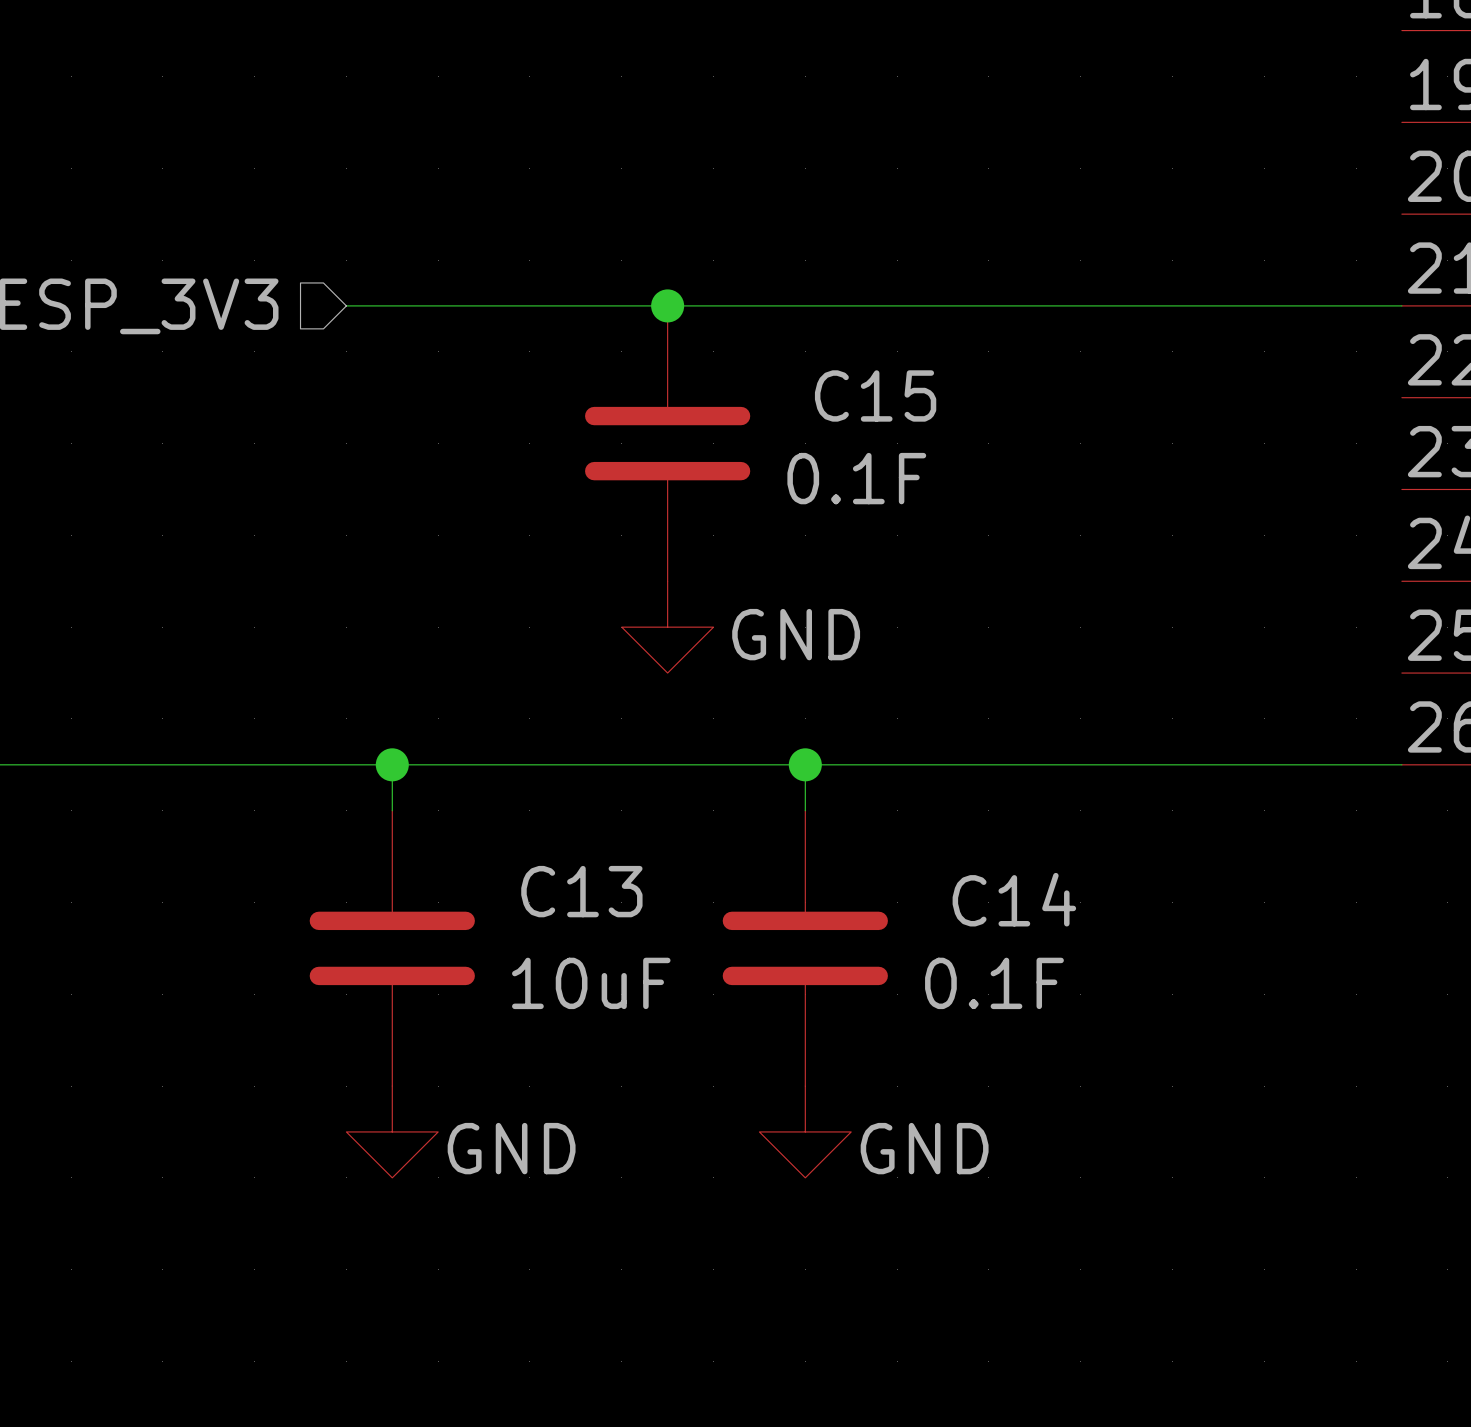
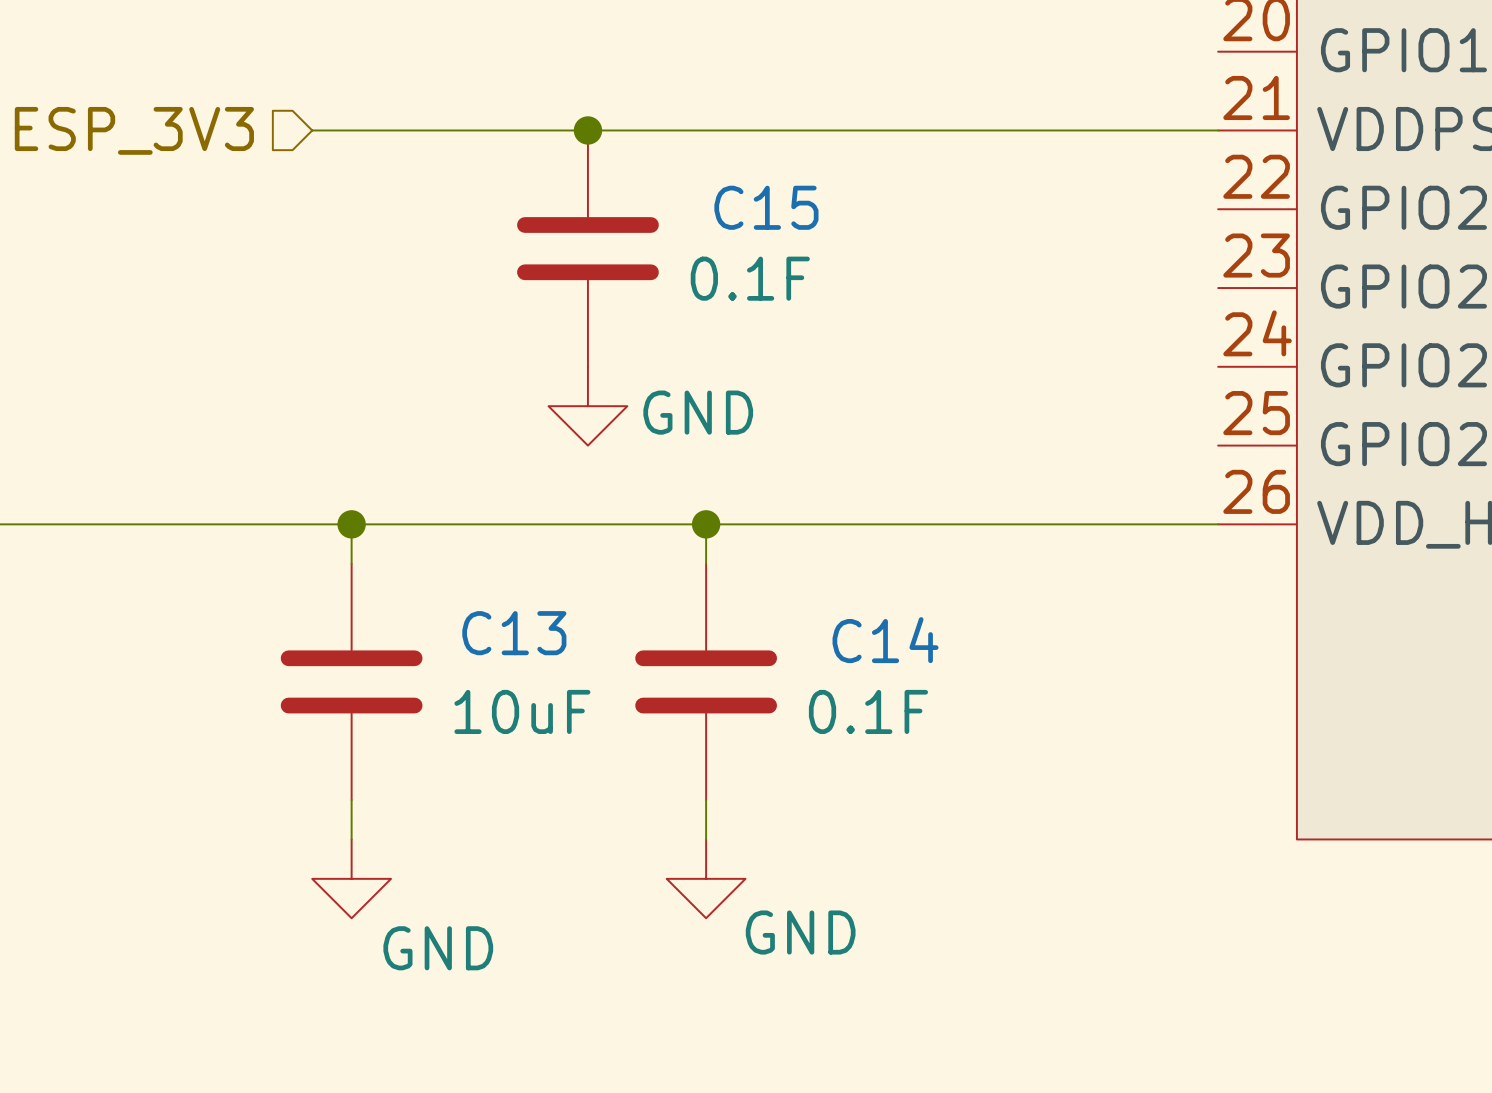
power symbol position: GND (392, 1131) -> GND (351, 878)
power symbol position: GND (805, 1131) -> GND (706, 878)
power symbol text position: GND (511, 1148) -> GND (438, 948)
power symbol text position: GND (924, 1148) -> GND (800, 932)

